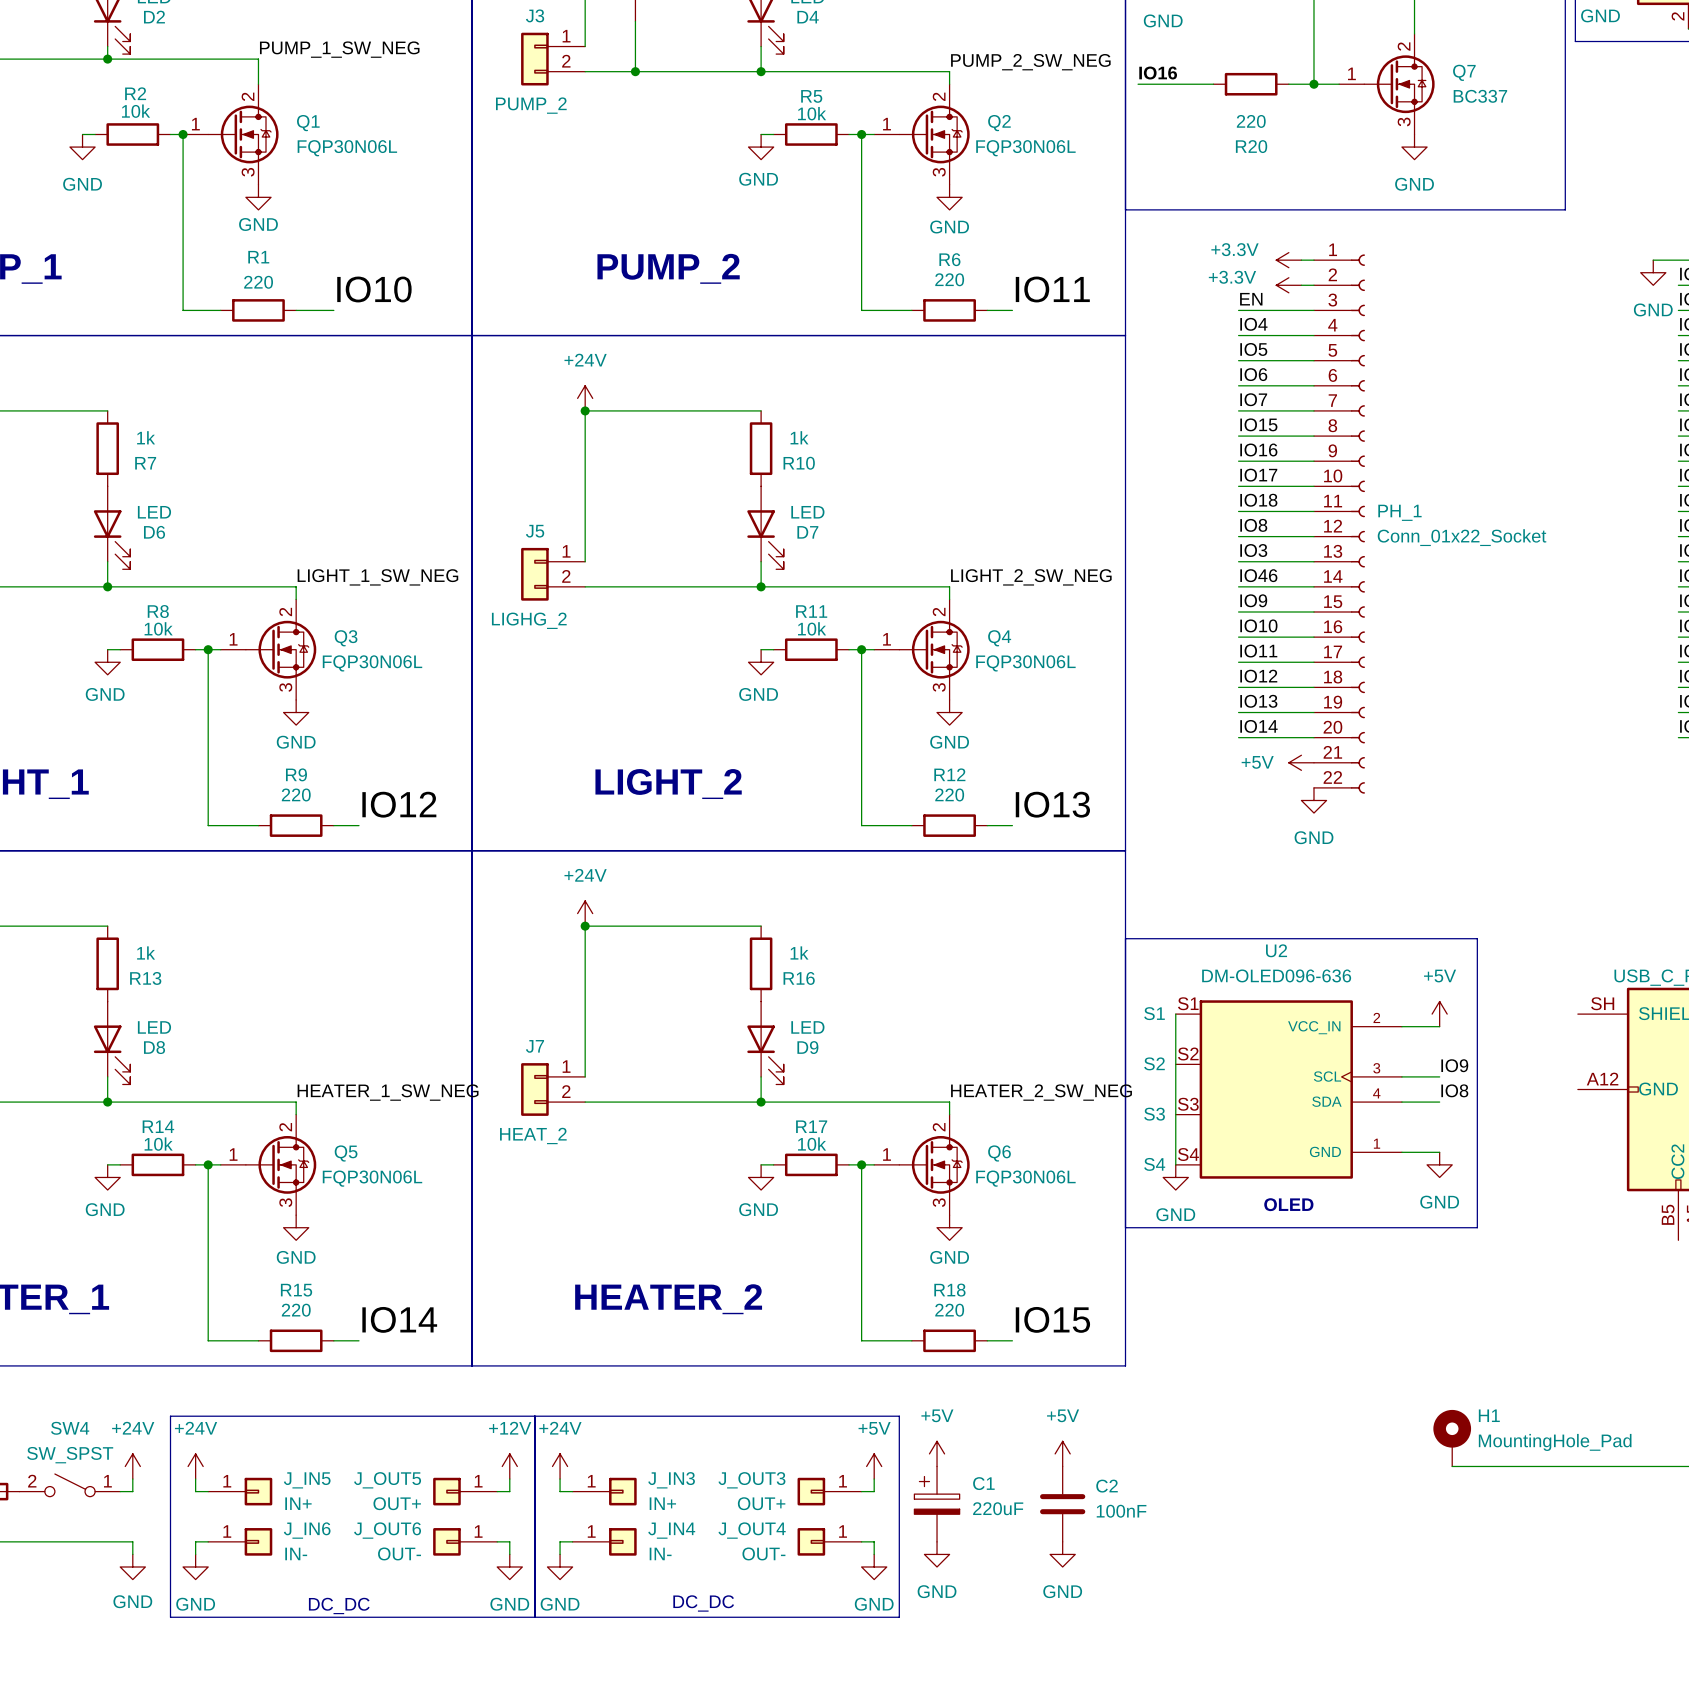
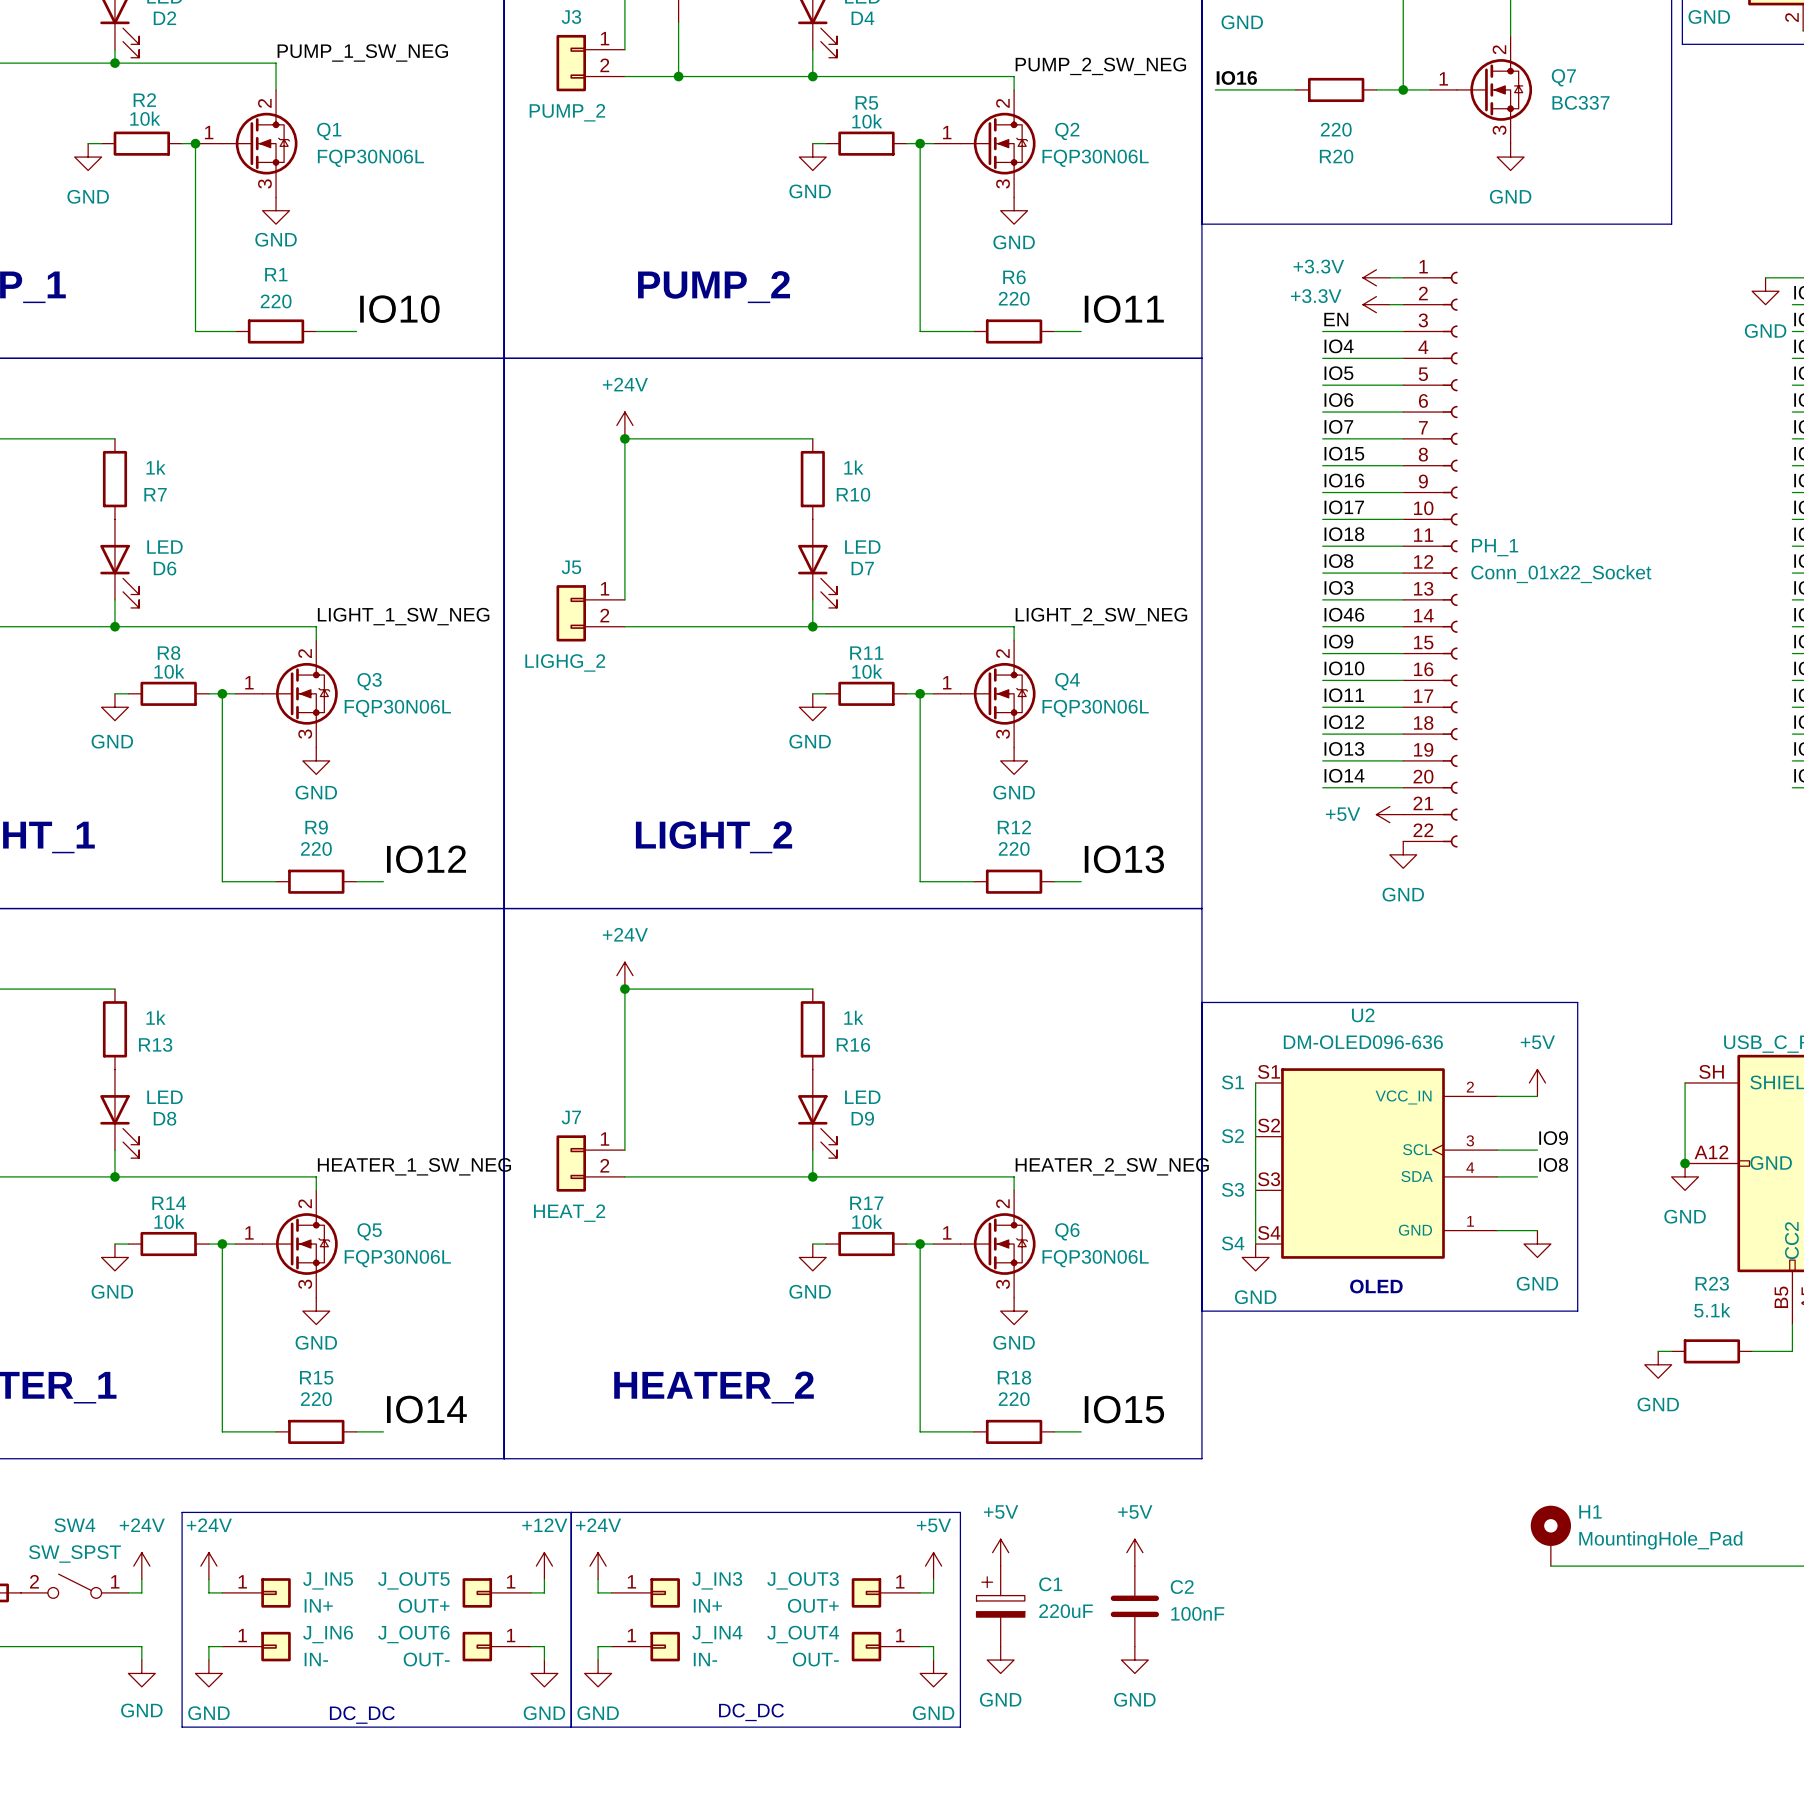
wire: none -> (1685, 1082) (1685, 1163)
junction: none -> (1685, 1163)
power symbol: none -> GND (1685, 1176)
wire: none -> (1792, 1324) (1792, 1351) (1752, 1351)
wire: none -> (1658, 1351) (1671, 1351)
R23: none -> 5.1k (1711, 1351)
power symbol: none -> GND (1658, 1364)

